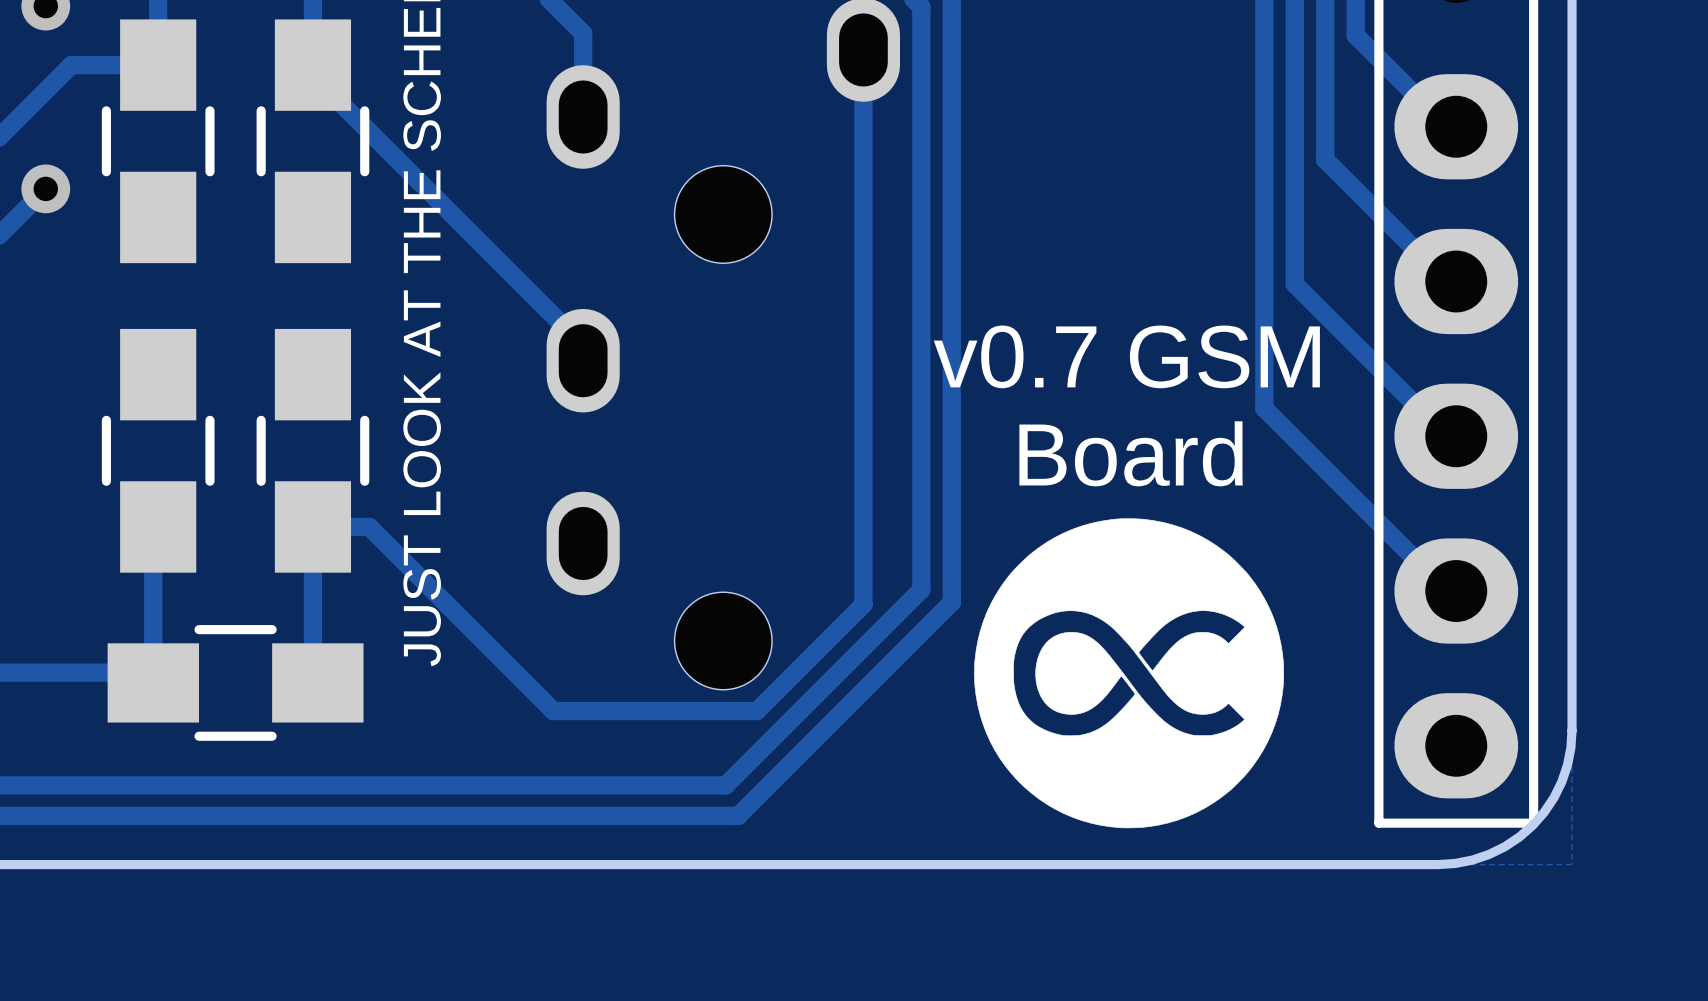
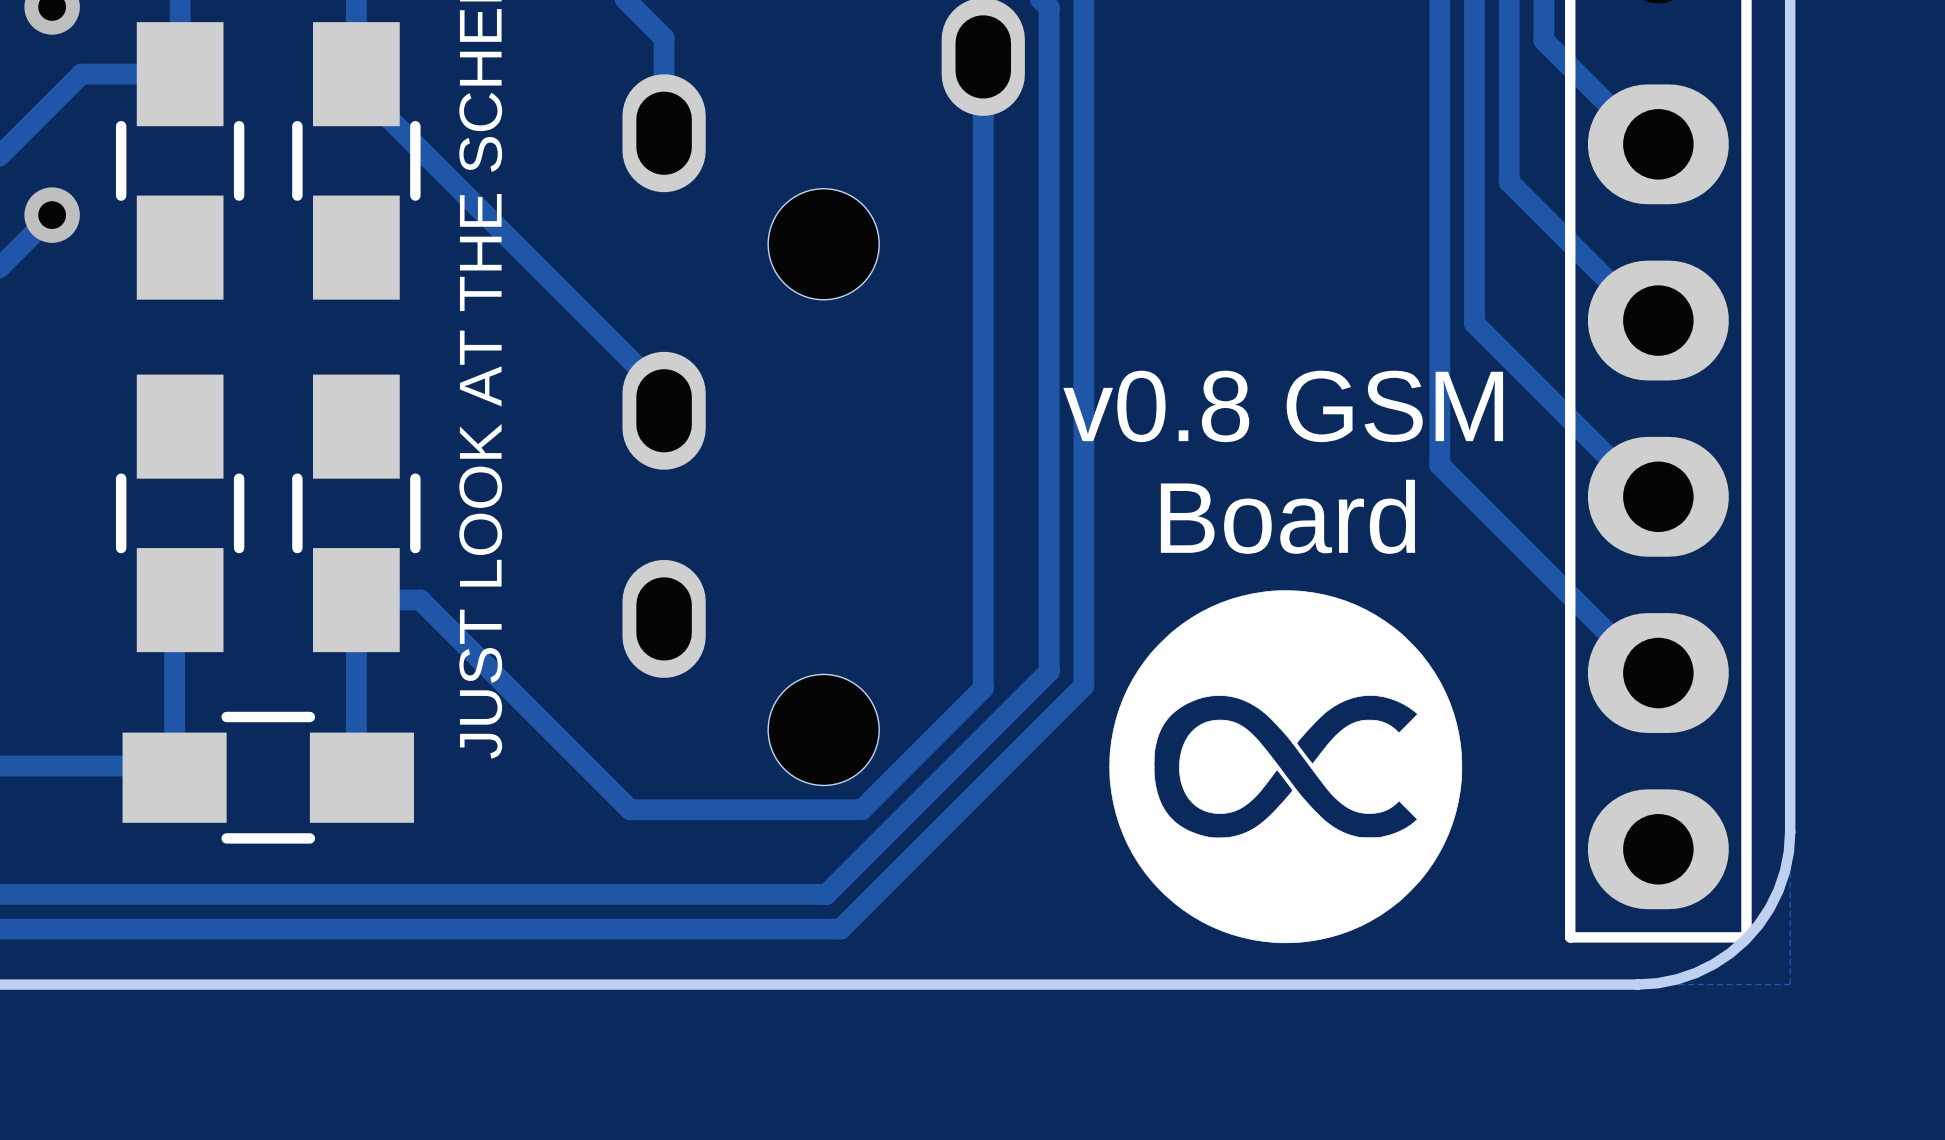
text: v0.7 GSM (1126, 356) -> v0.8 GSM (1283, 406)

